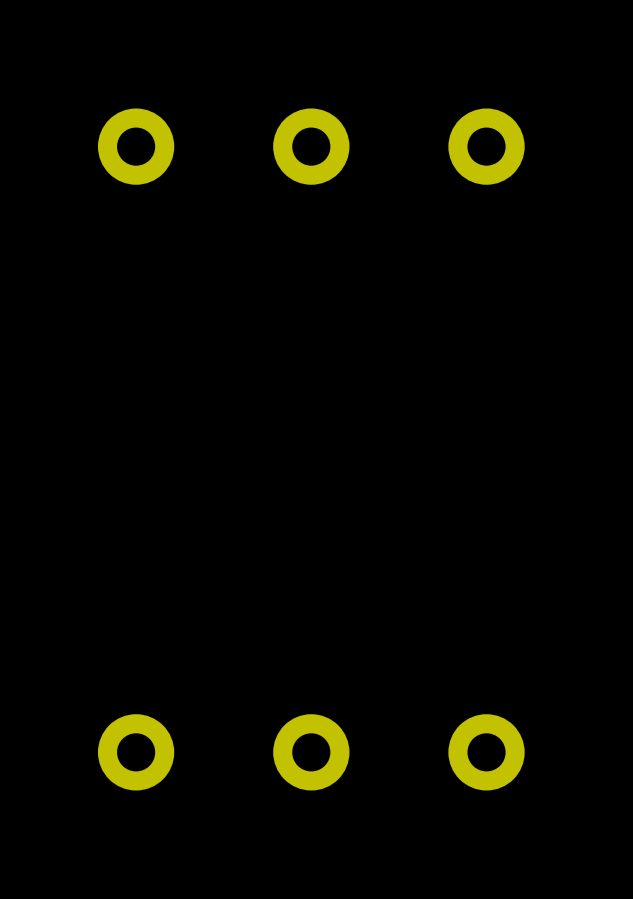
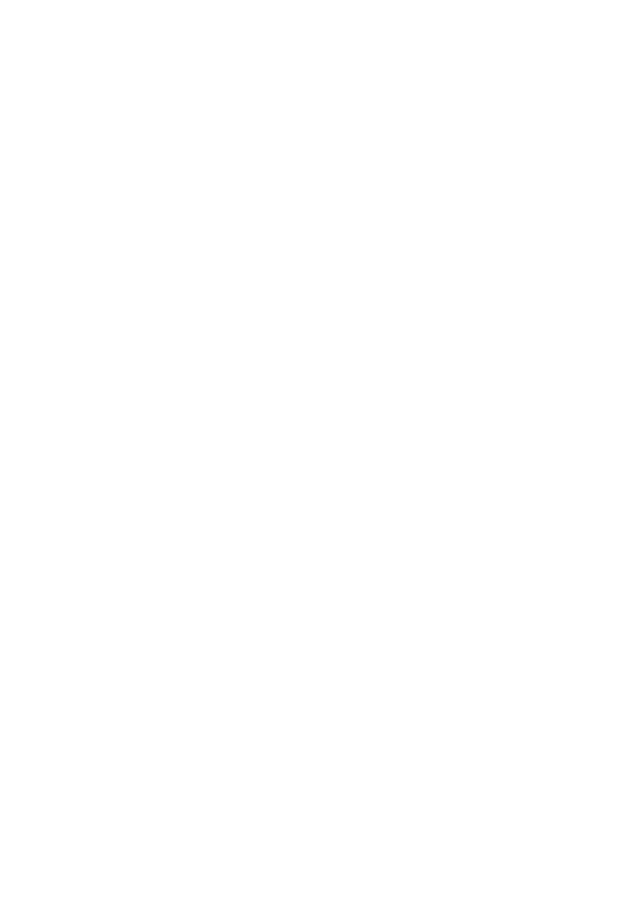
part: (311, 146) -> none
part: (311, 752) -> none

